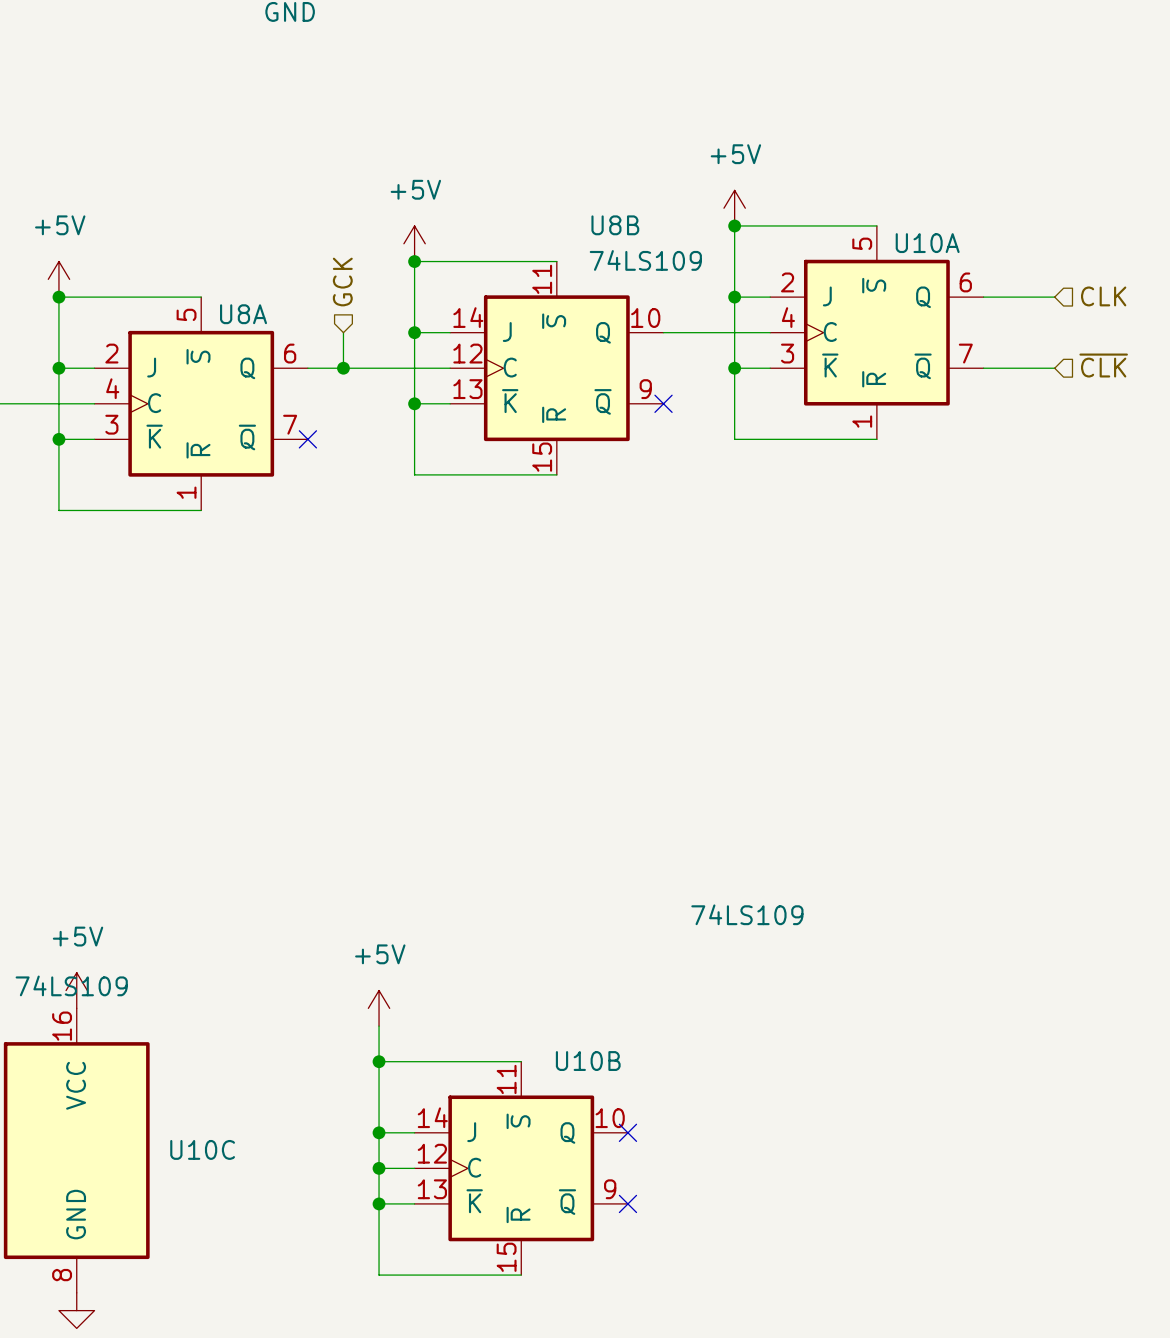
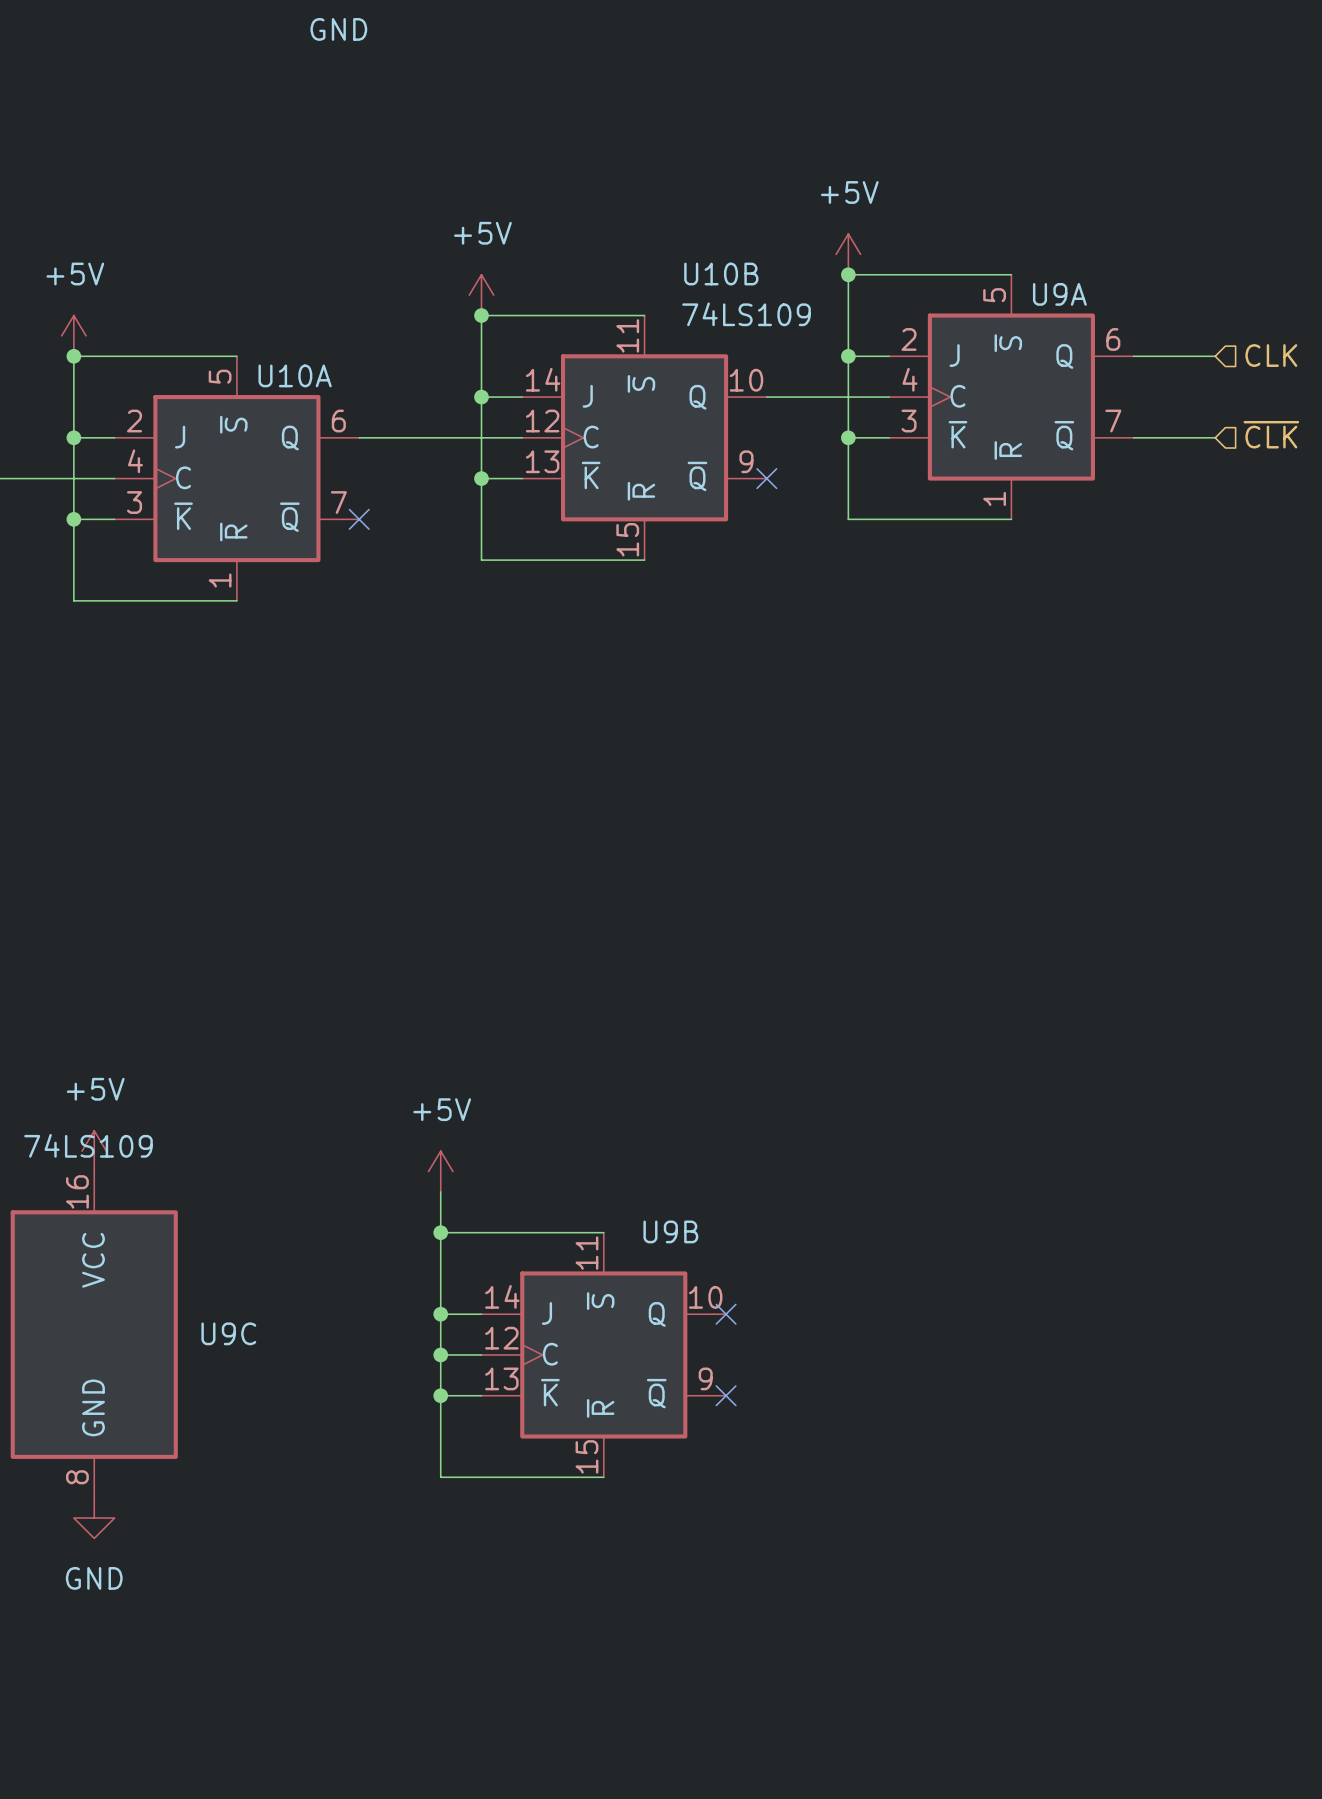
U8B name: U8B (615, 225) -> U10B (721, 274)
U10A name: U10A (927, 243) -> U9A (1059, 294)
hierarchical label: GCK (342, 282) -> none
U8A name: U8A (243, 314) -> U10A (295, 375)
wire: (343, 332) (343, 368) -> none
junction: (343, 368) -> none
U10A value: 74LS109 (747, 914) -> none
U10B name: U10B (588, 1061) -> U9B (670, 1231)
U10C name: U10C (202, 1149) -> U9C (228, 1333)

